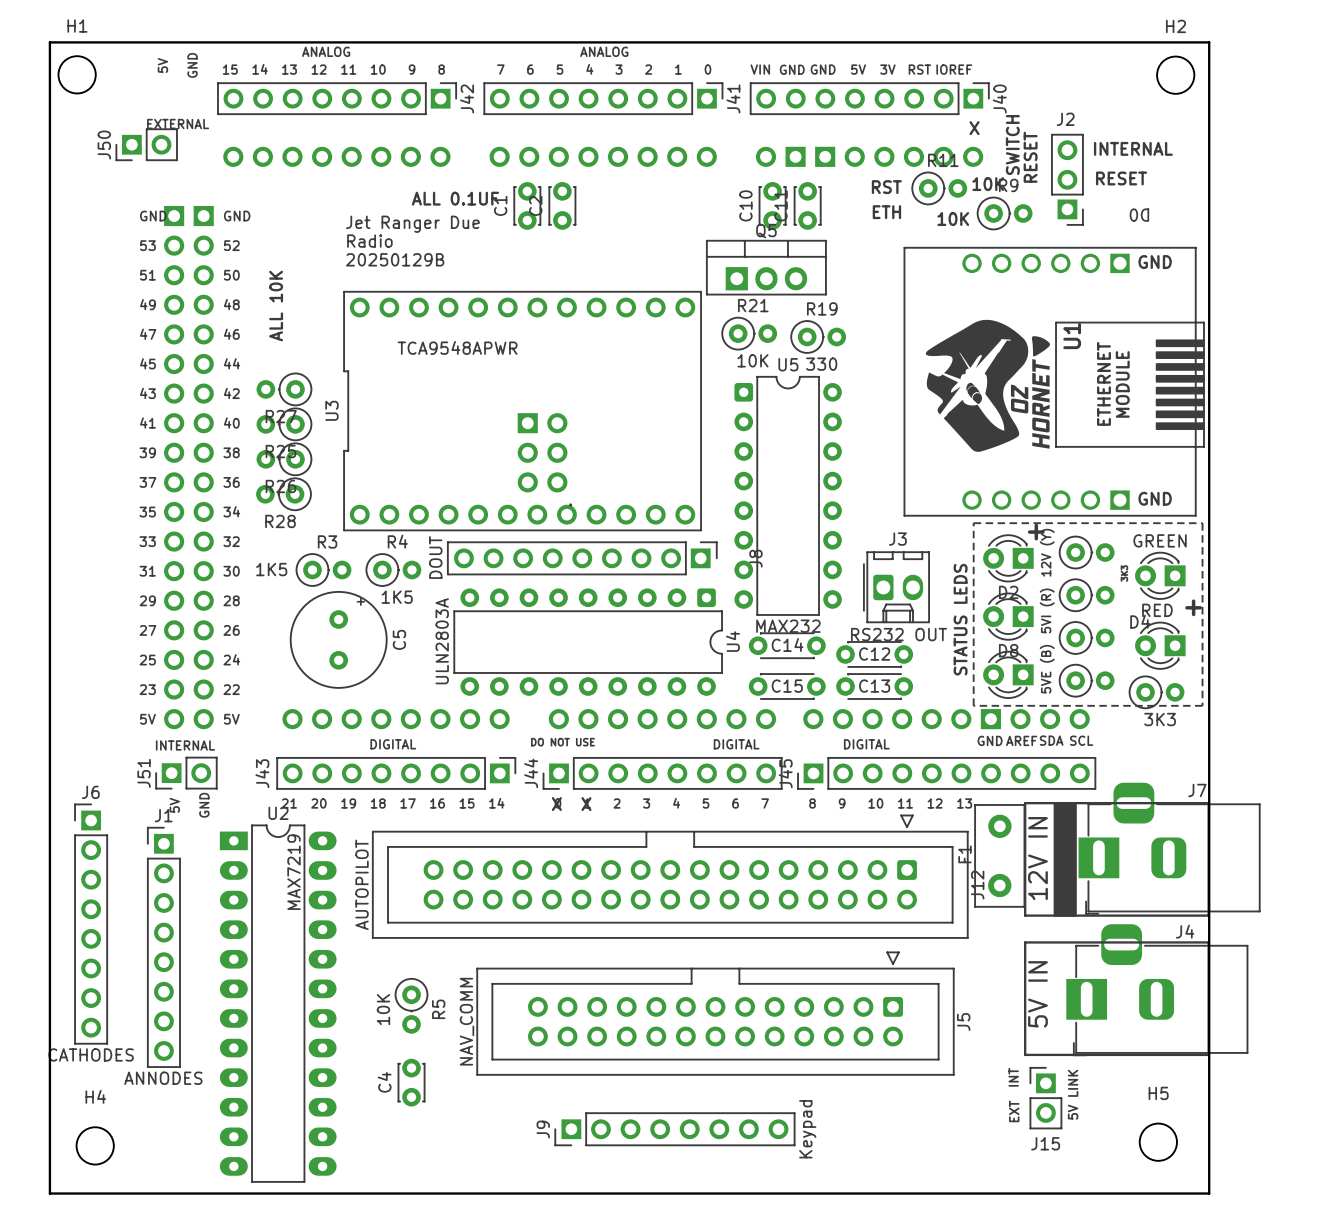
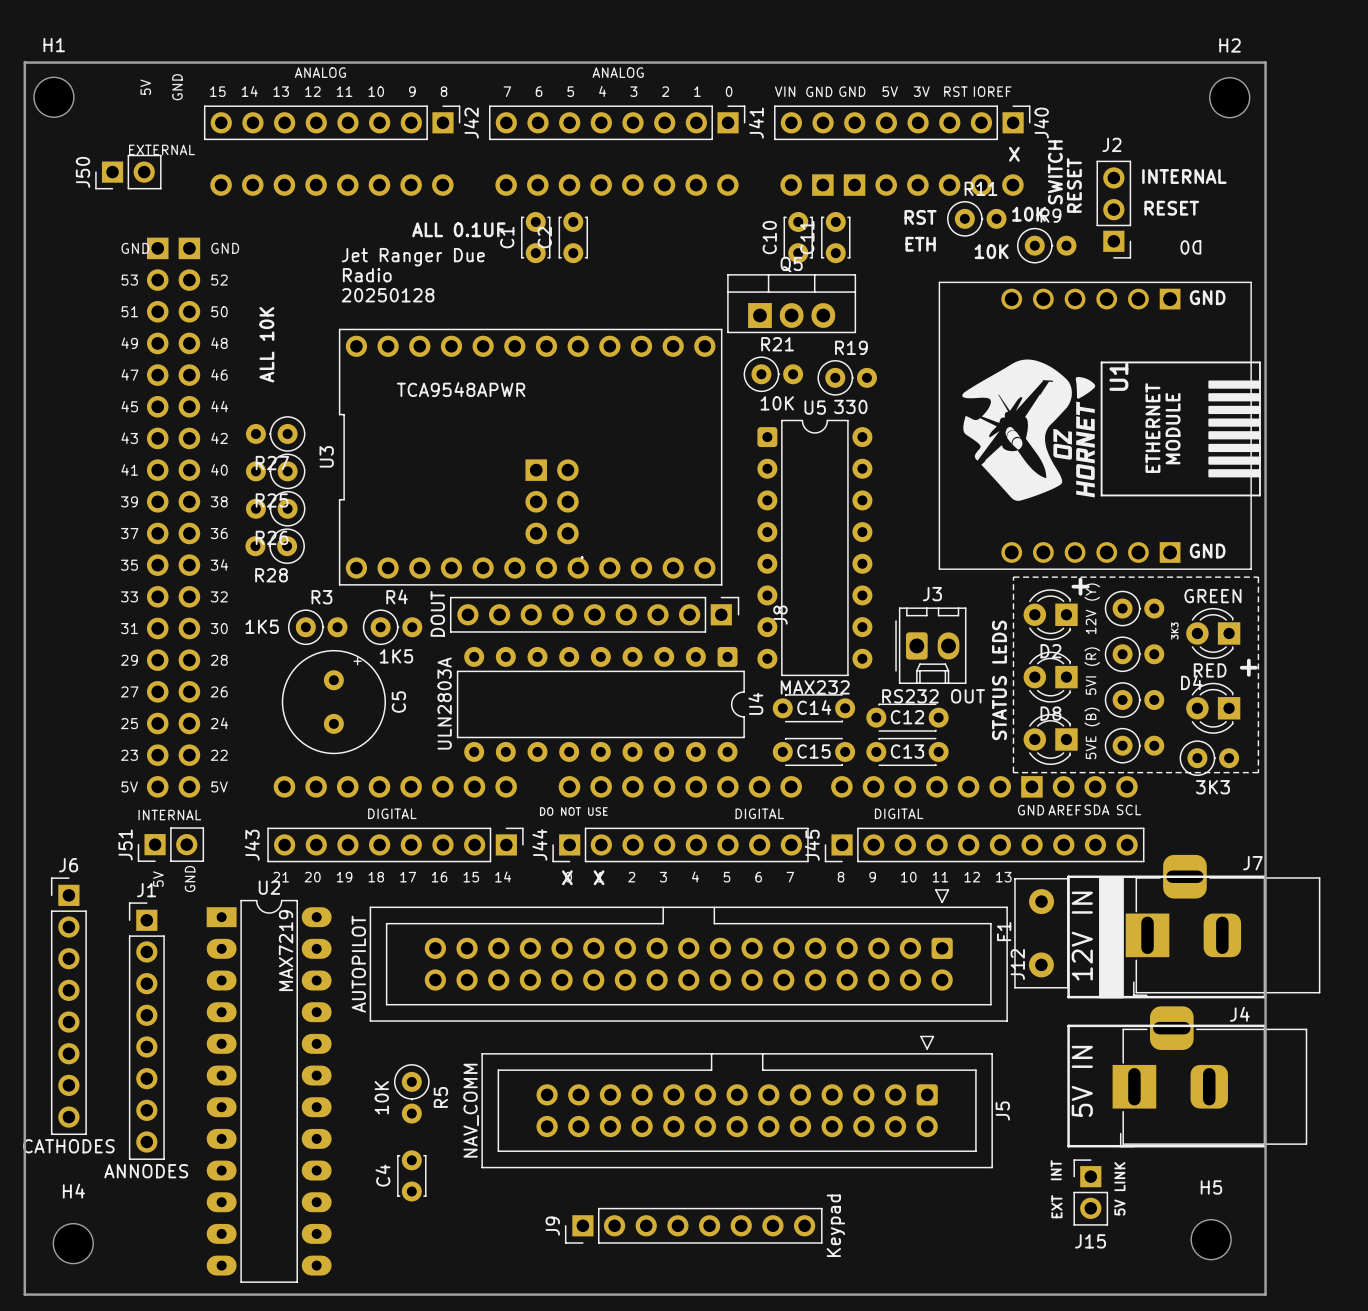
text: 20250129B (395, 259) -> 20250128 (388, 295)

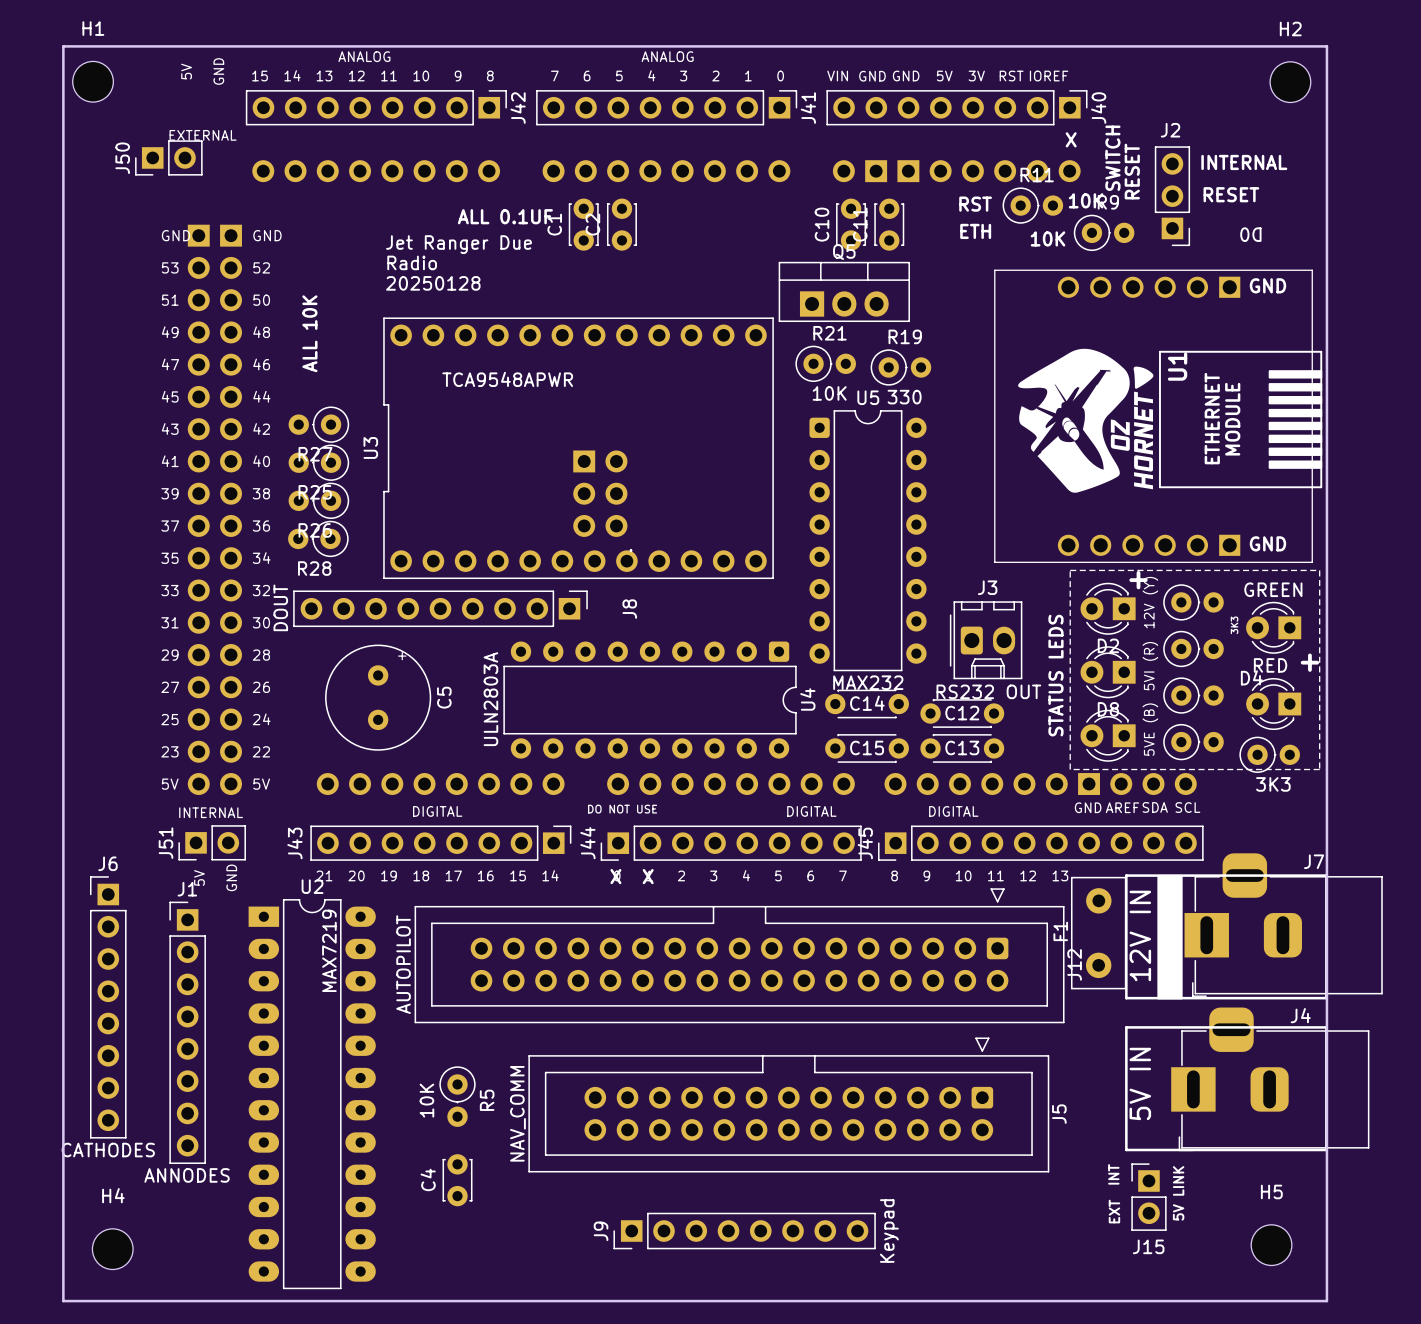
J8 position: (594, 614) -> (440, 608)
R3: 1K5 (317, 627) -> none
R4: 1K5 (392, 627) -> none

